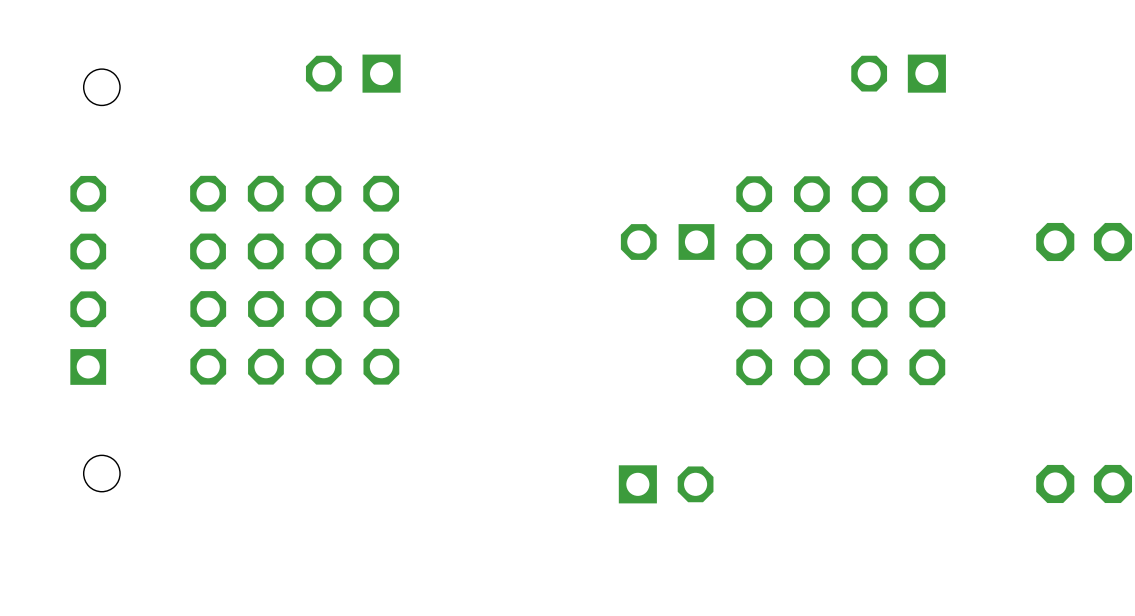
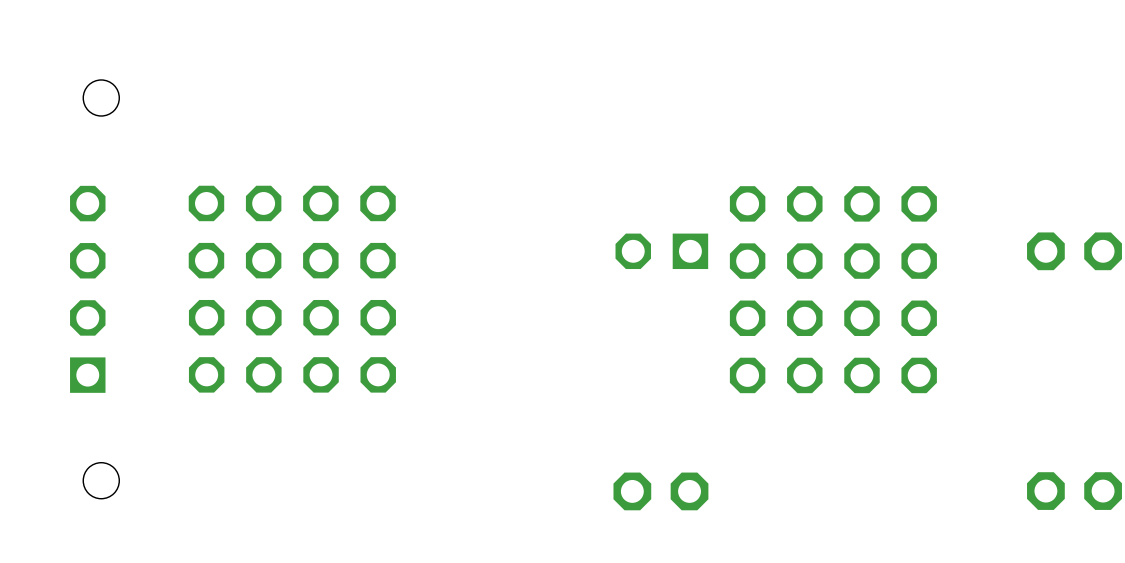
part: (353, 73) -> none
part: (898, 73) -> none
part footprint: [618, 465, 714, 504] -> [613, 472, 709, 511]

